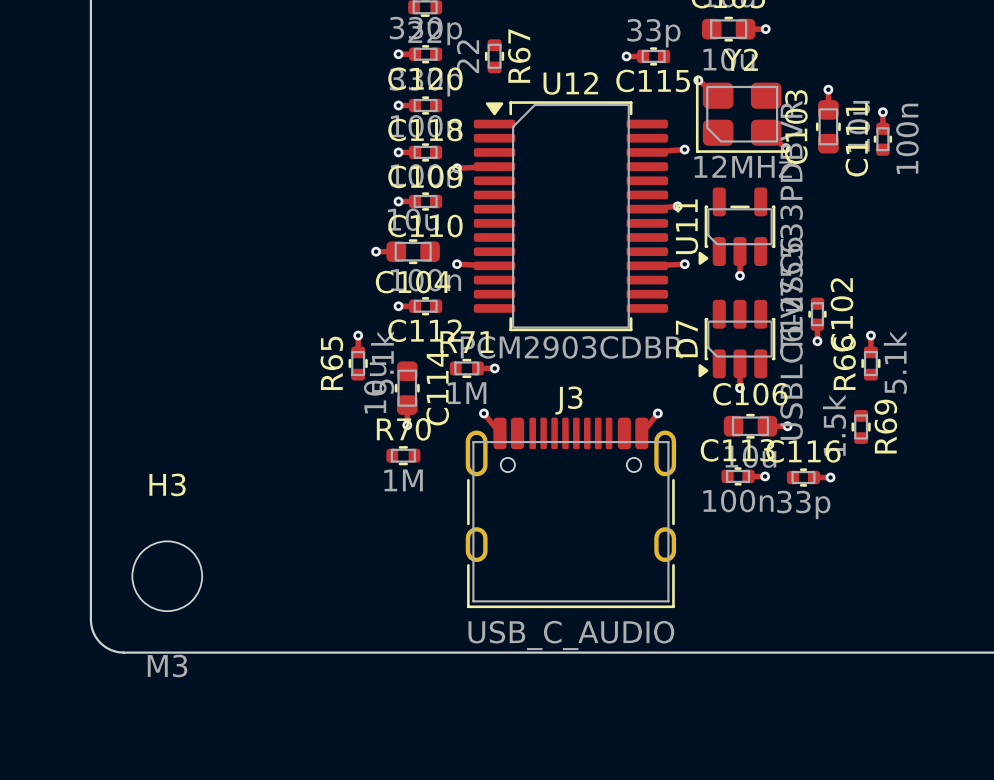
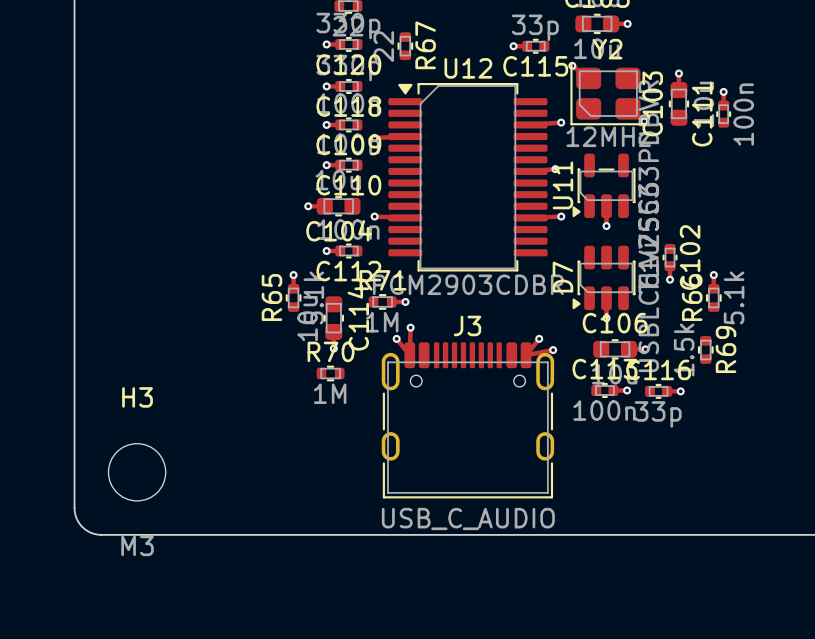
top track: none -> (410, 327) (409, 355)
via: none -> (410, 327)
top track: none -> (553, 350) (526, 355)
via: none -> (553, 350)

